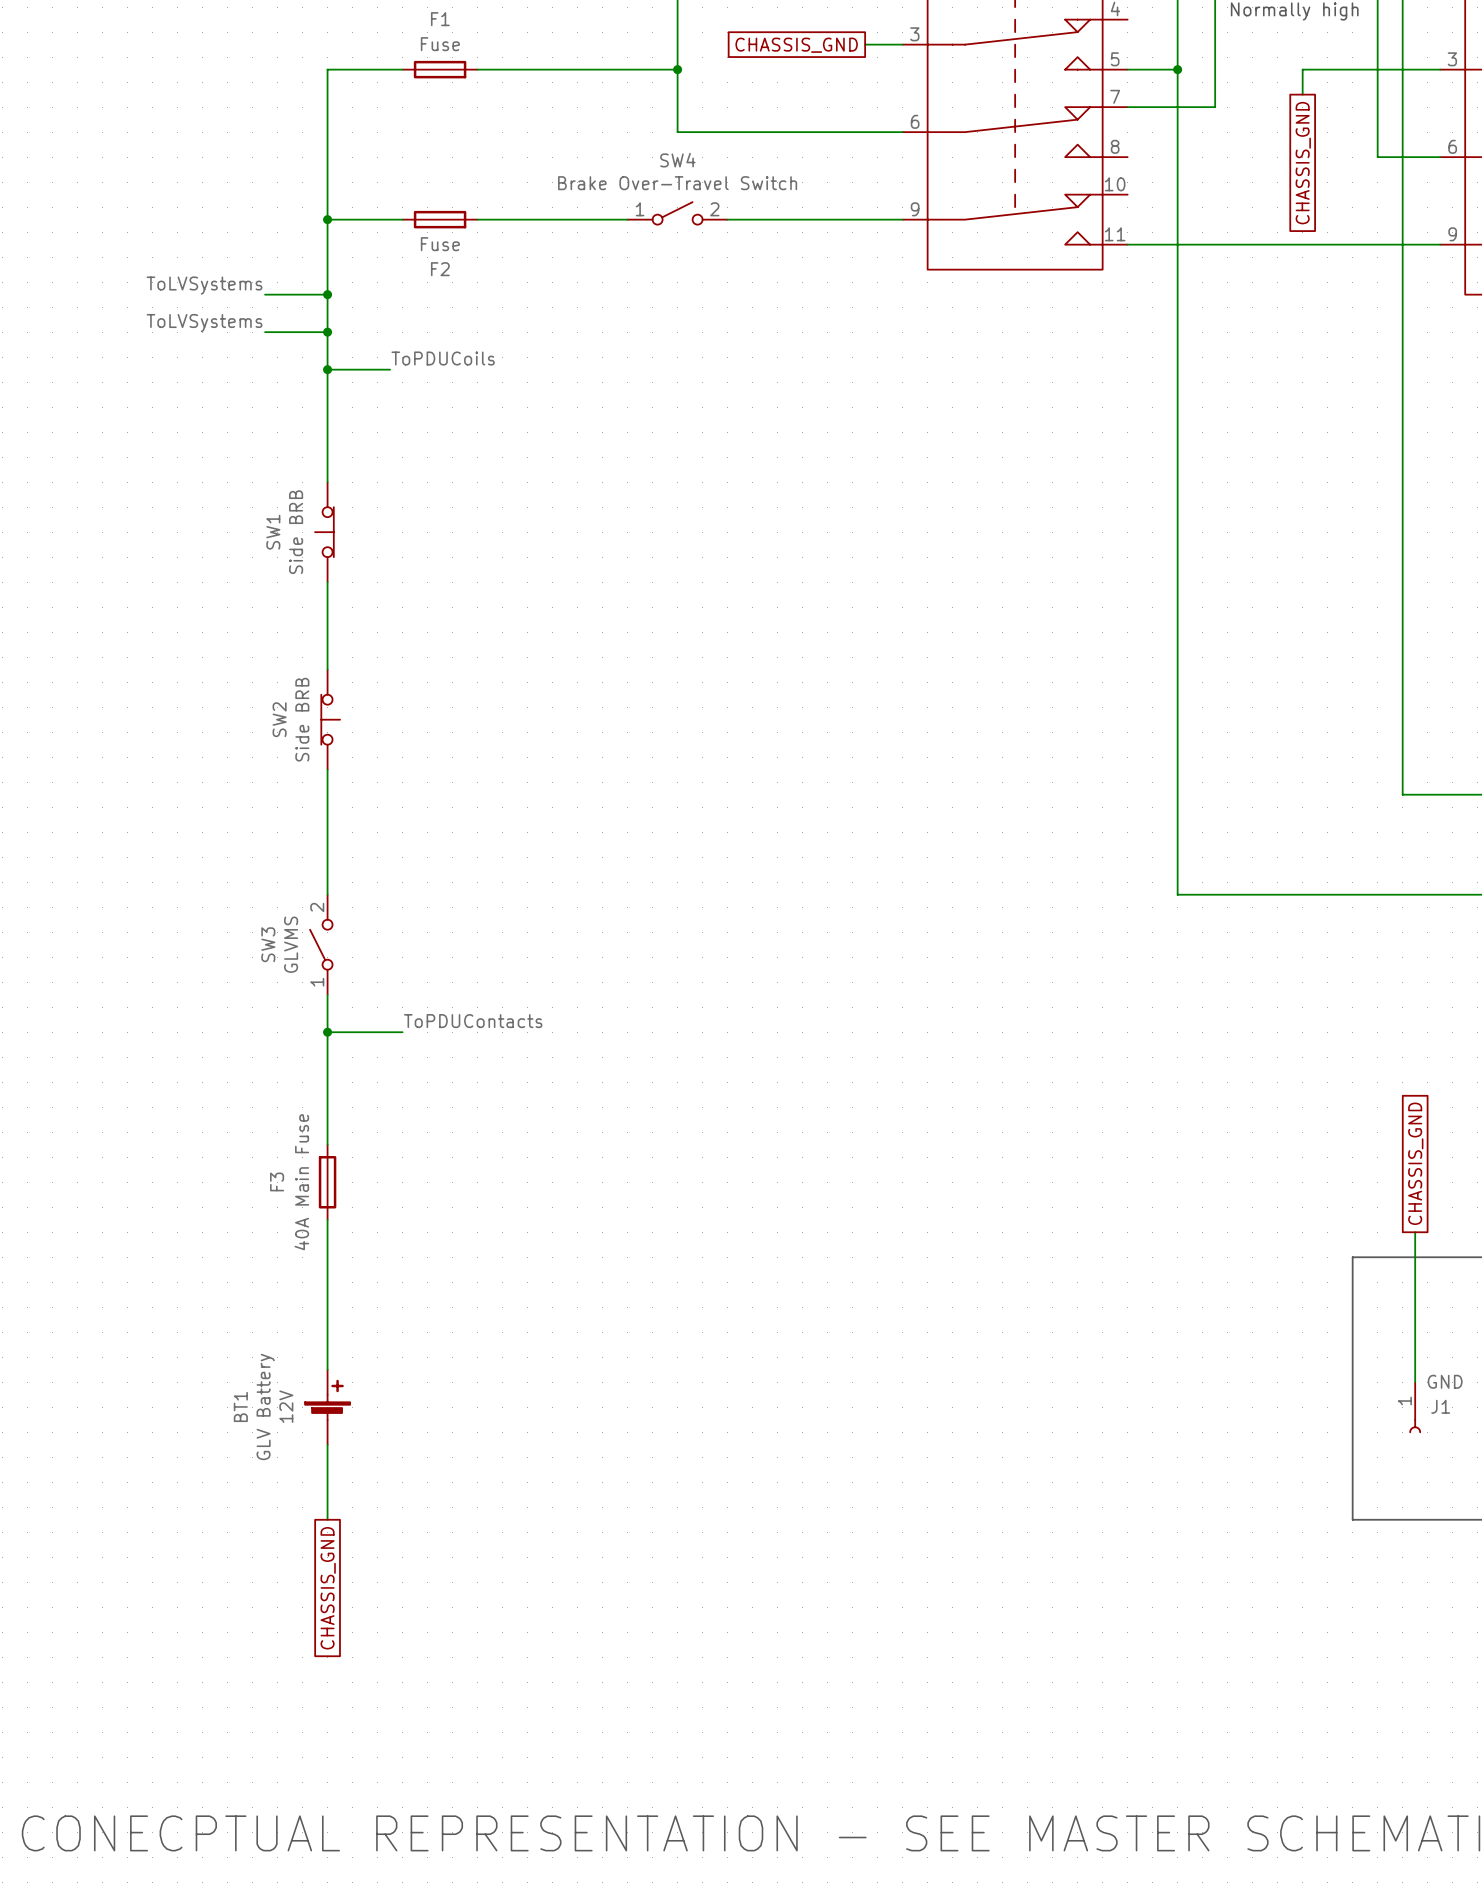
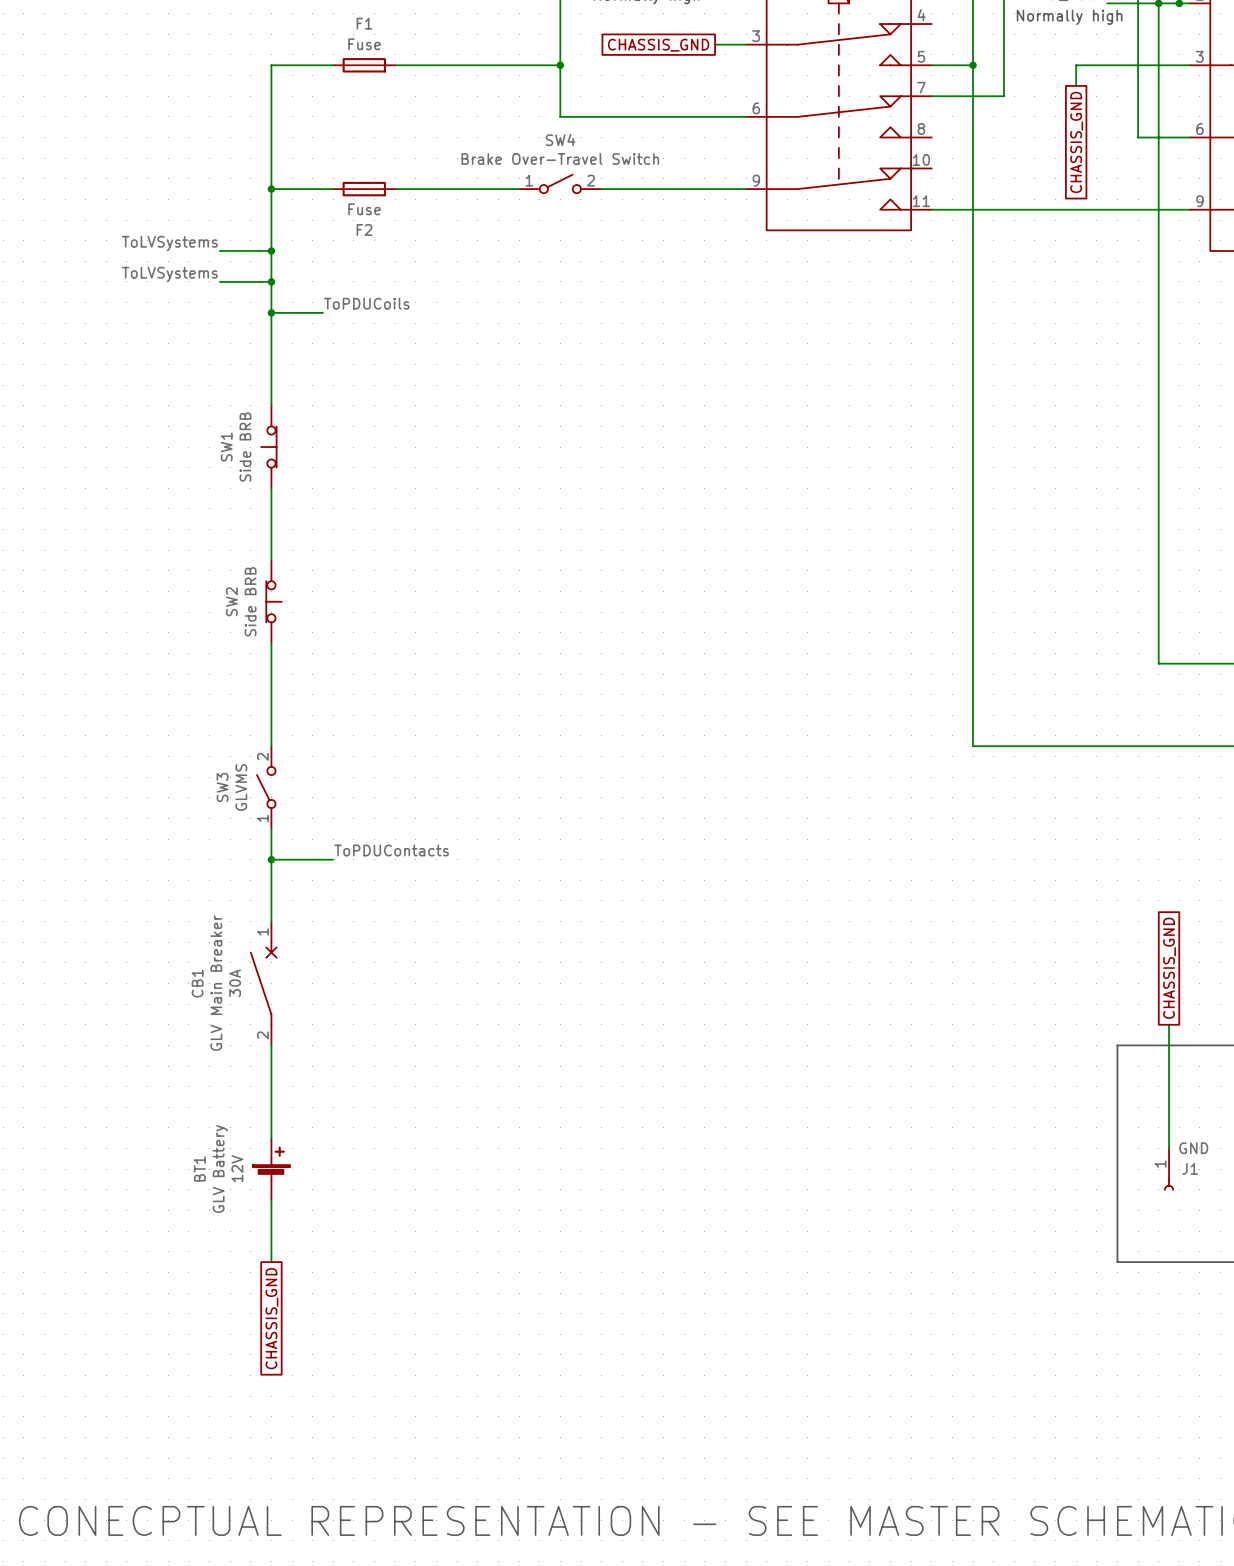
CB1: none -> GLV Main Breaker (263, 983)
F3: 40A Main Fuse (327, 1182) -> none

